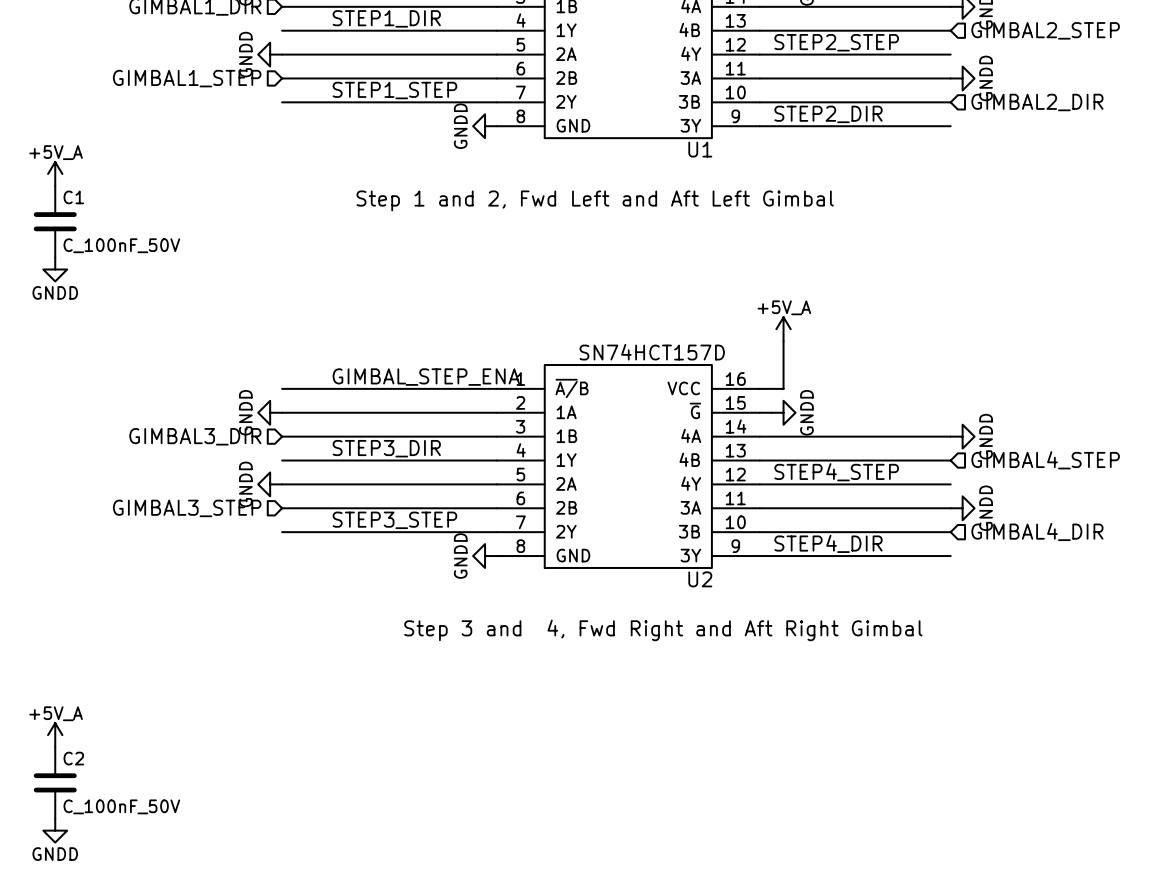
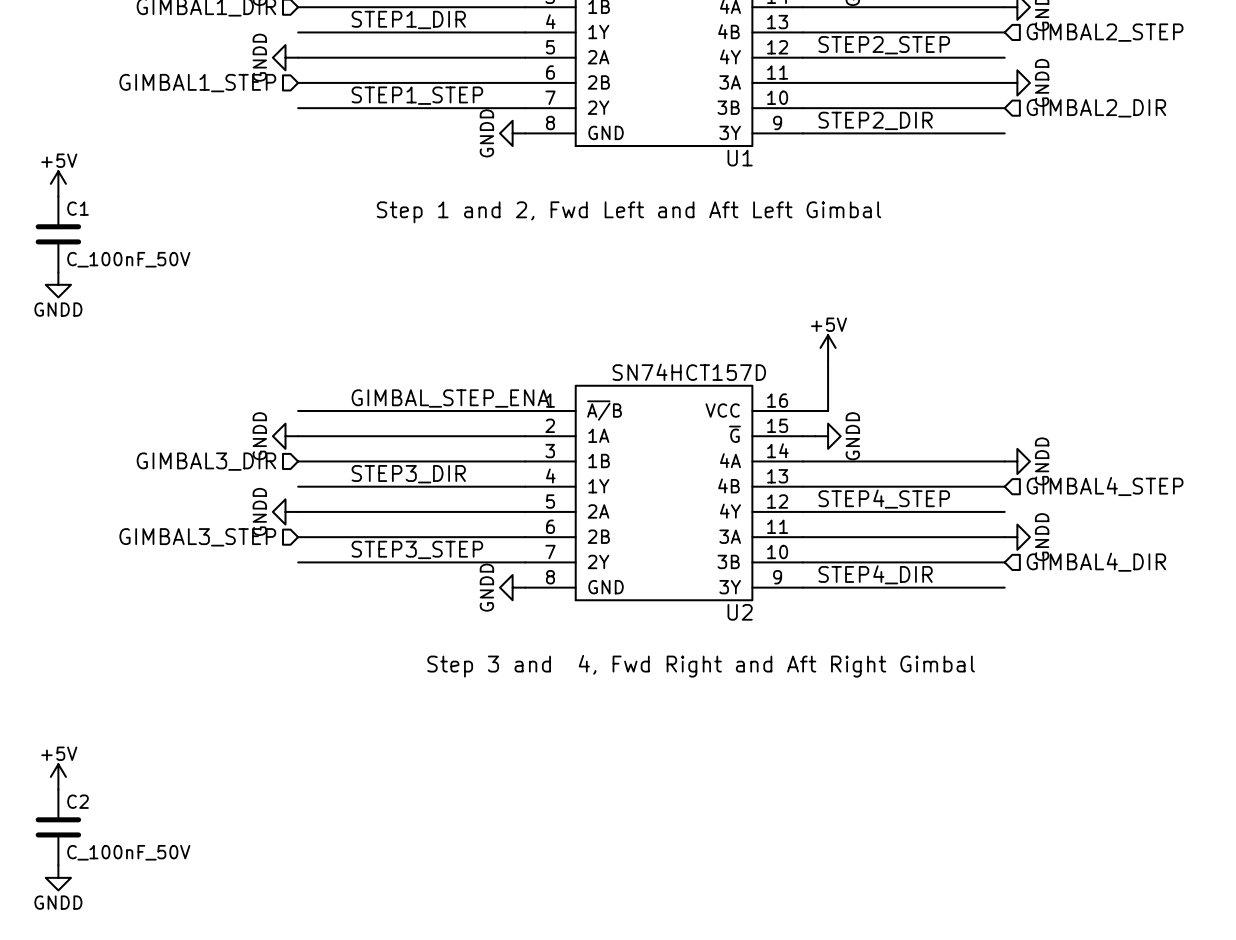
power symbol: +5V_A (55, 173) -> +5V (58, 183)
power symbol: +5V_A (783, 329) -> +5V (828, 347)
power symbol: +5V_A (55, 735) -> +5V (58, 776)

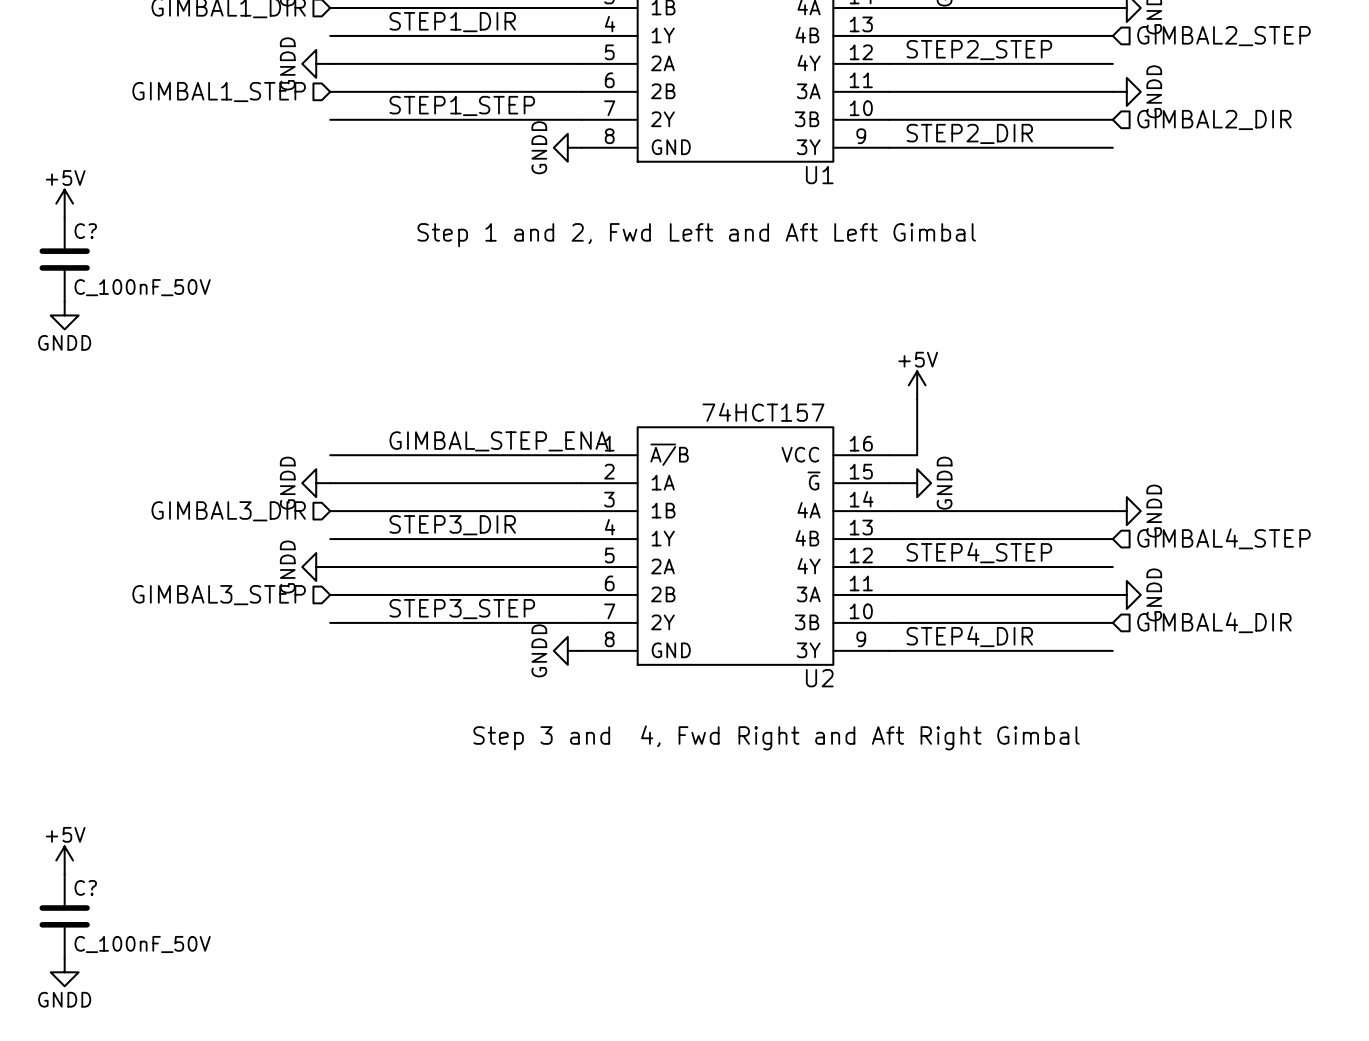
C1 name: C1 (78, 208) -> C? (85, 231)
U2 value: SN74HCT157D (689, 372) -> 74HCT157 (763, 412)
C2 name: C2 (78, 801) -> C? (85, 887)

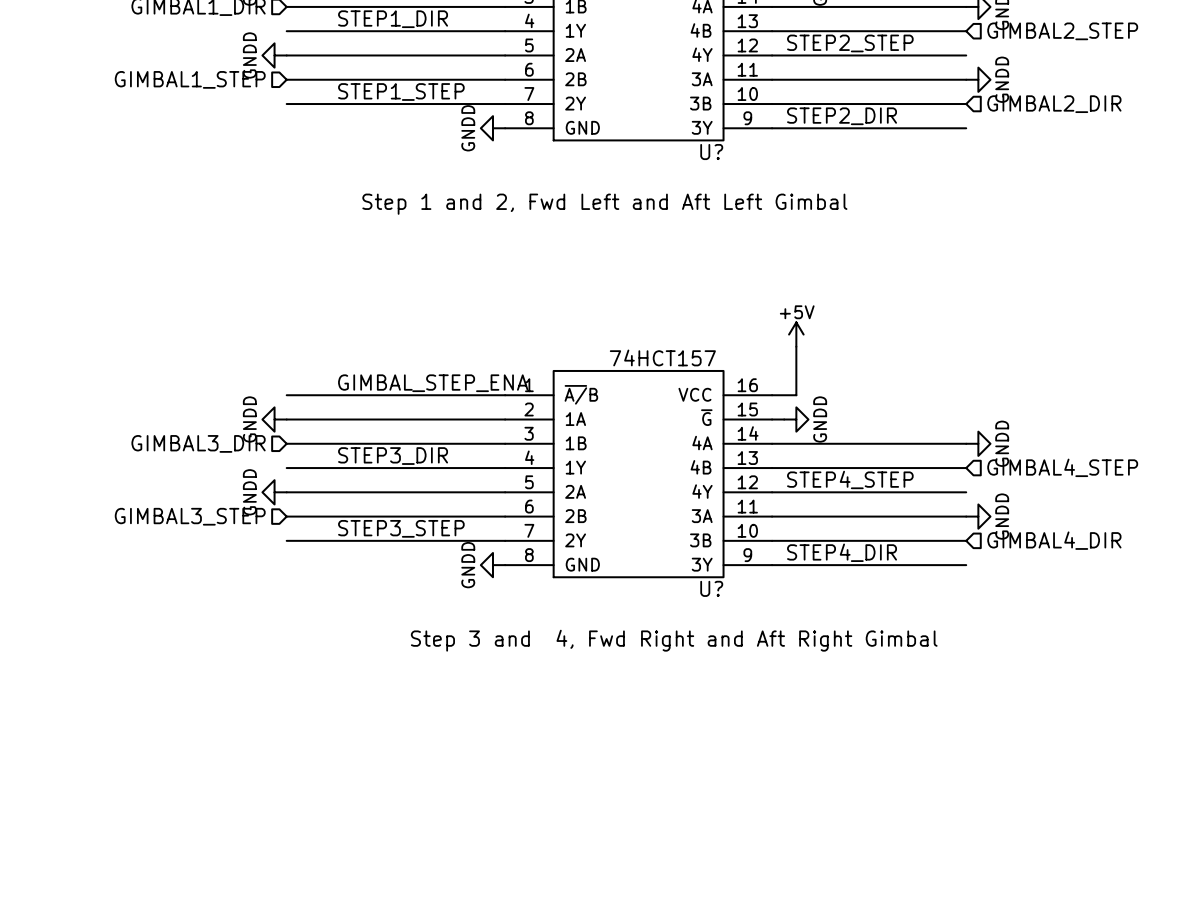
U1 name: U1 (819, 175) -> U? (711, 152)
power symbol: +5V (64, 203) -> none
C?: C_100nF_50V (64, 259) -> none
power symbol: GNDD (64, 315) -> none
U2 name: U2 (819, 678) -> U? (711, 588)
power symbol: +5V (64, 860) -> none
C?: C_100nF_50V (64, 916) -> none
power symbol: GNDD (64, 972) -> none

